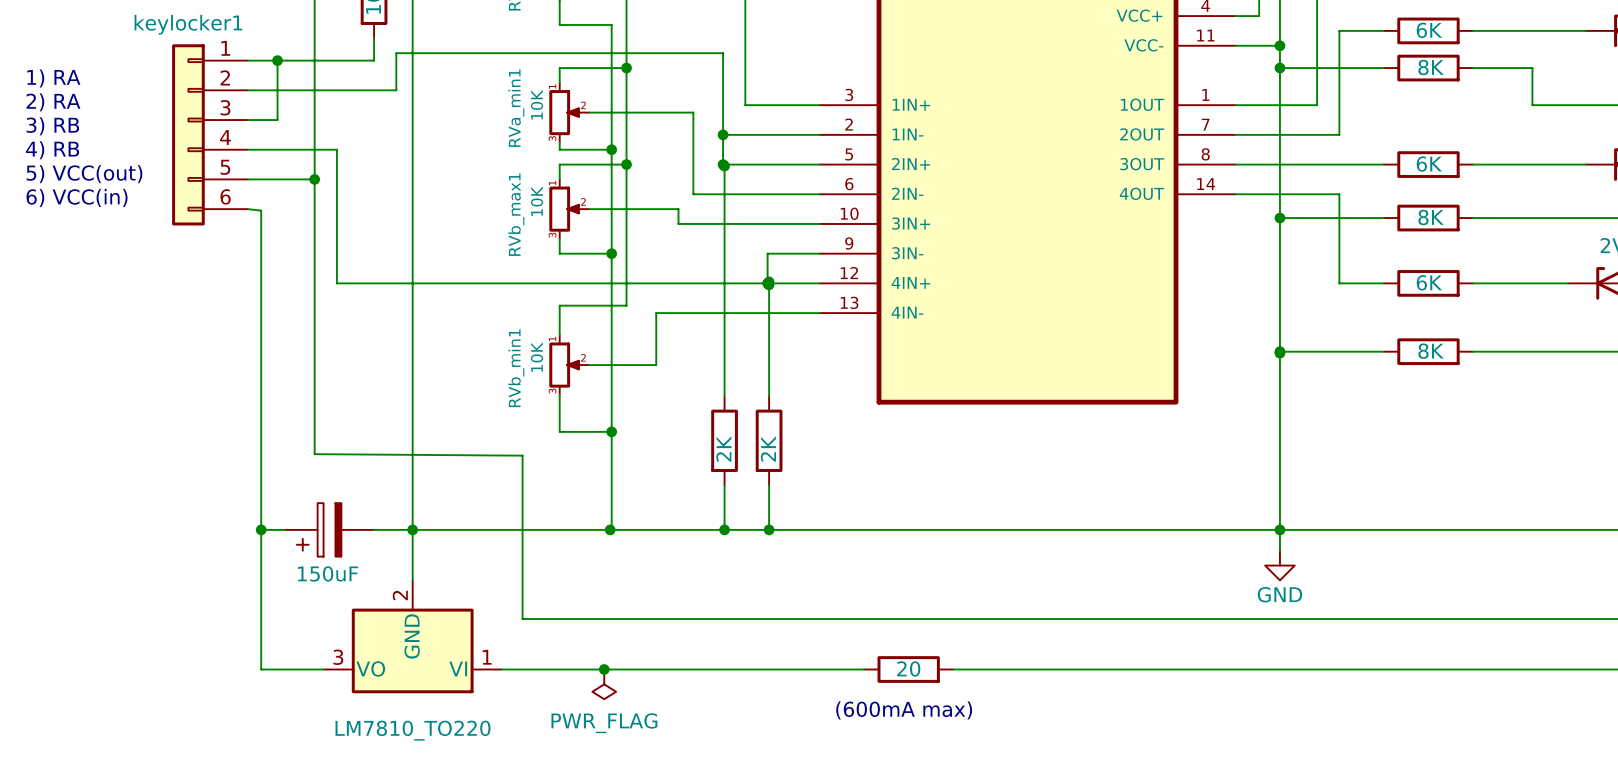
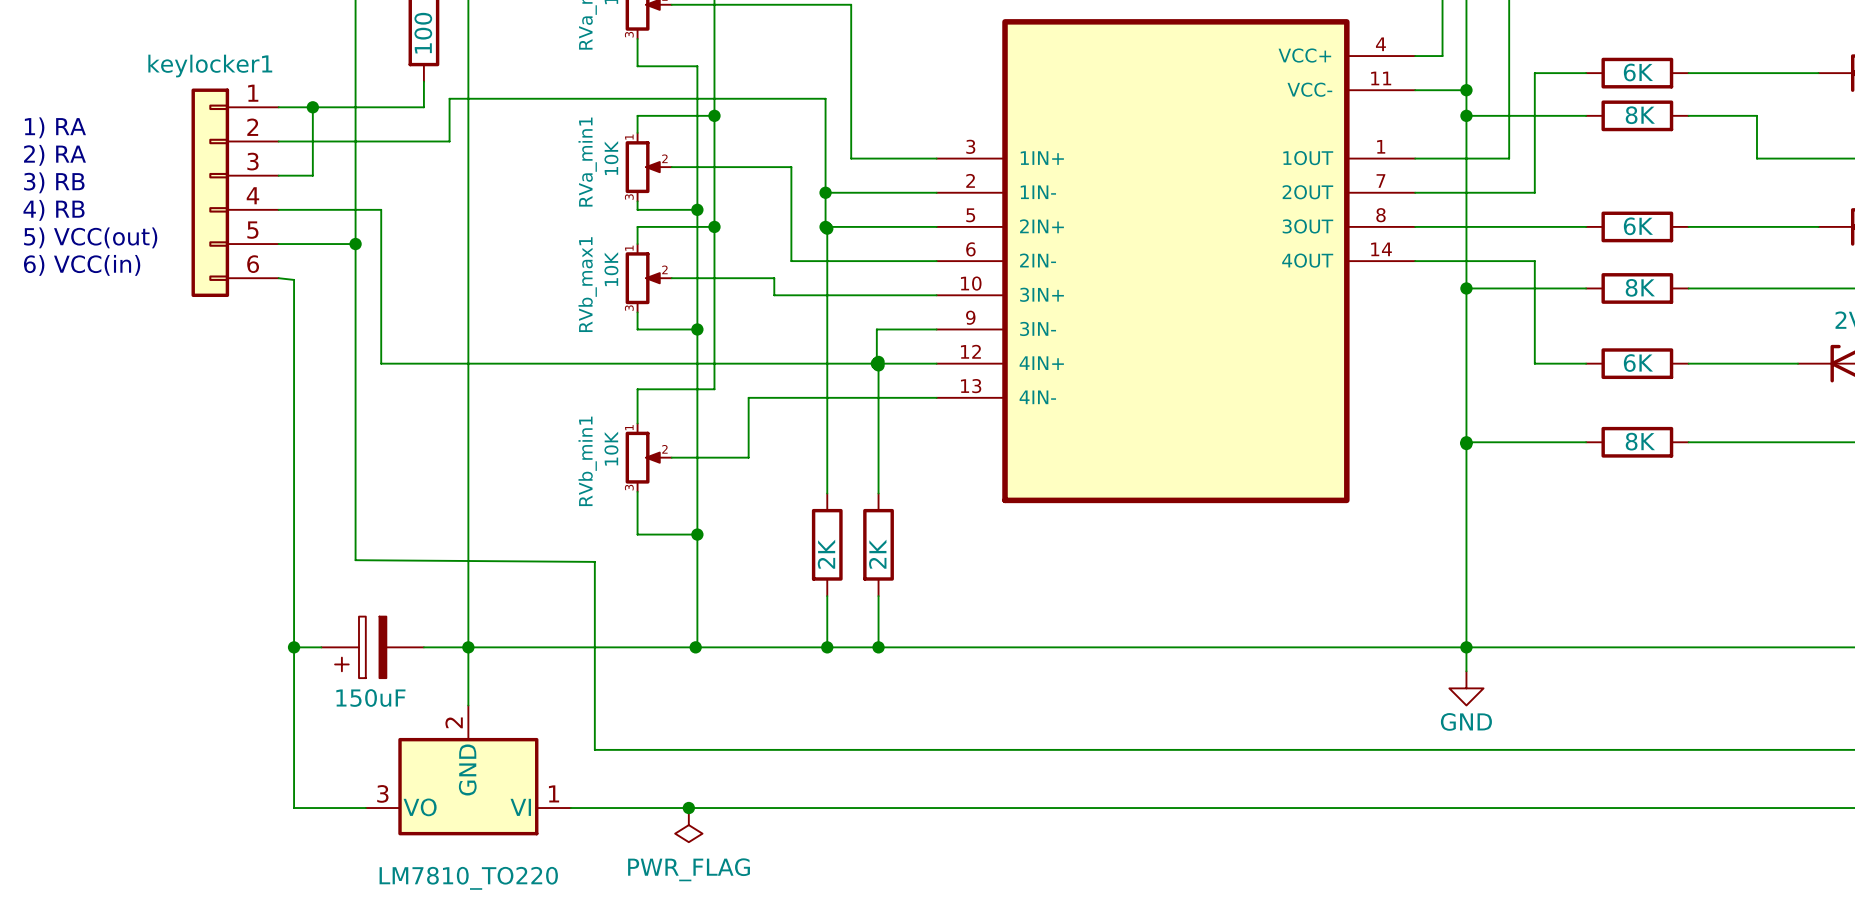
wire: none -> (987, 808) (1090, 808)
part: 20 (908, 669) -> none
text: (600mA max) (904, 710) -> none

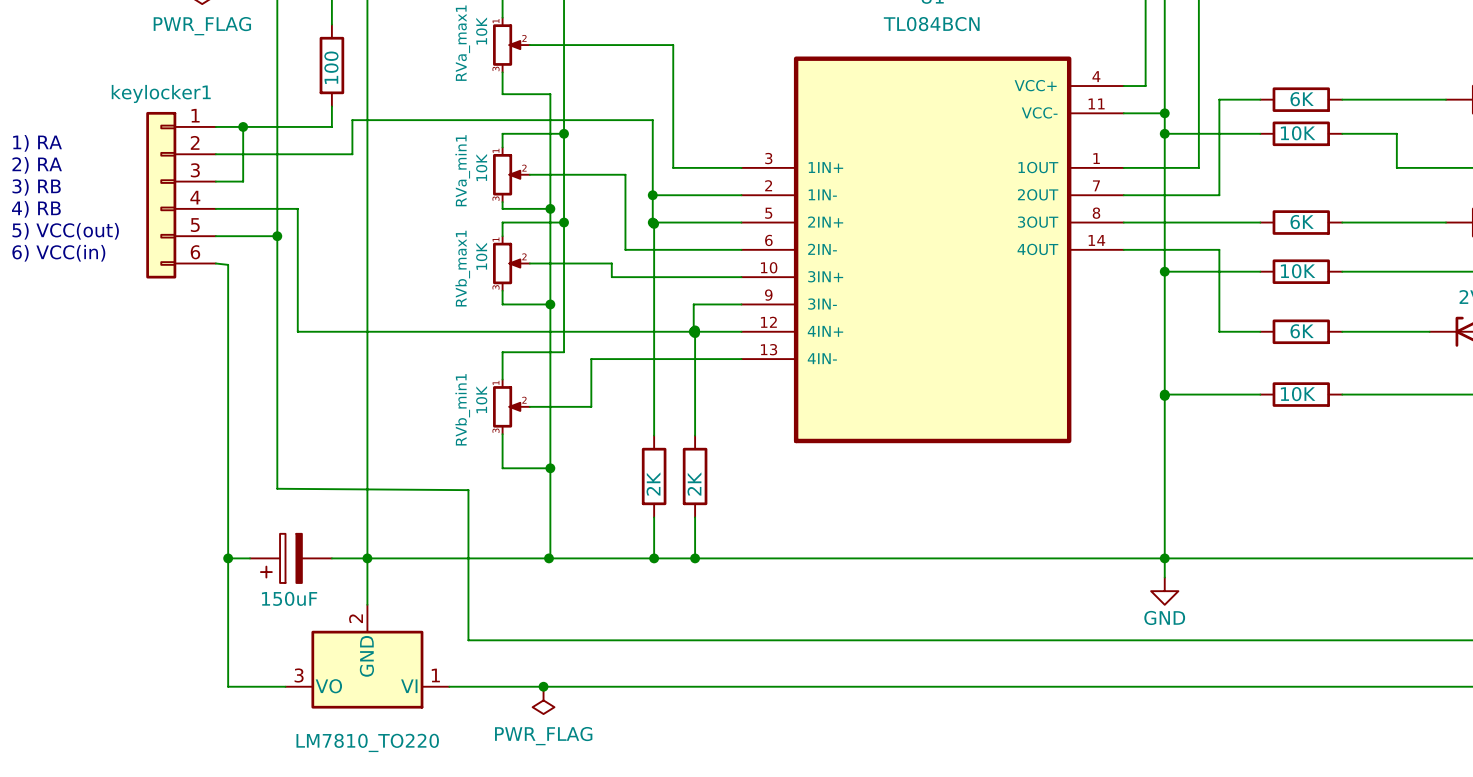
part value: 8K (1640, 115) -> 10K (1298, 133)
part value: 8K (1640, 287) -> 10K (1298, 271)
part value: 8K (1640, 441) -> 10K (1298, 394)

